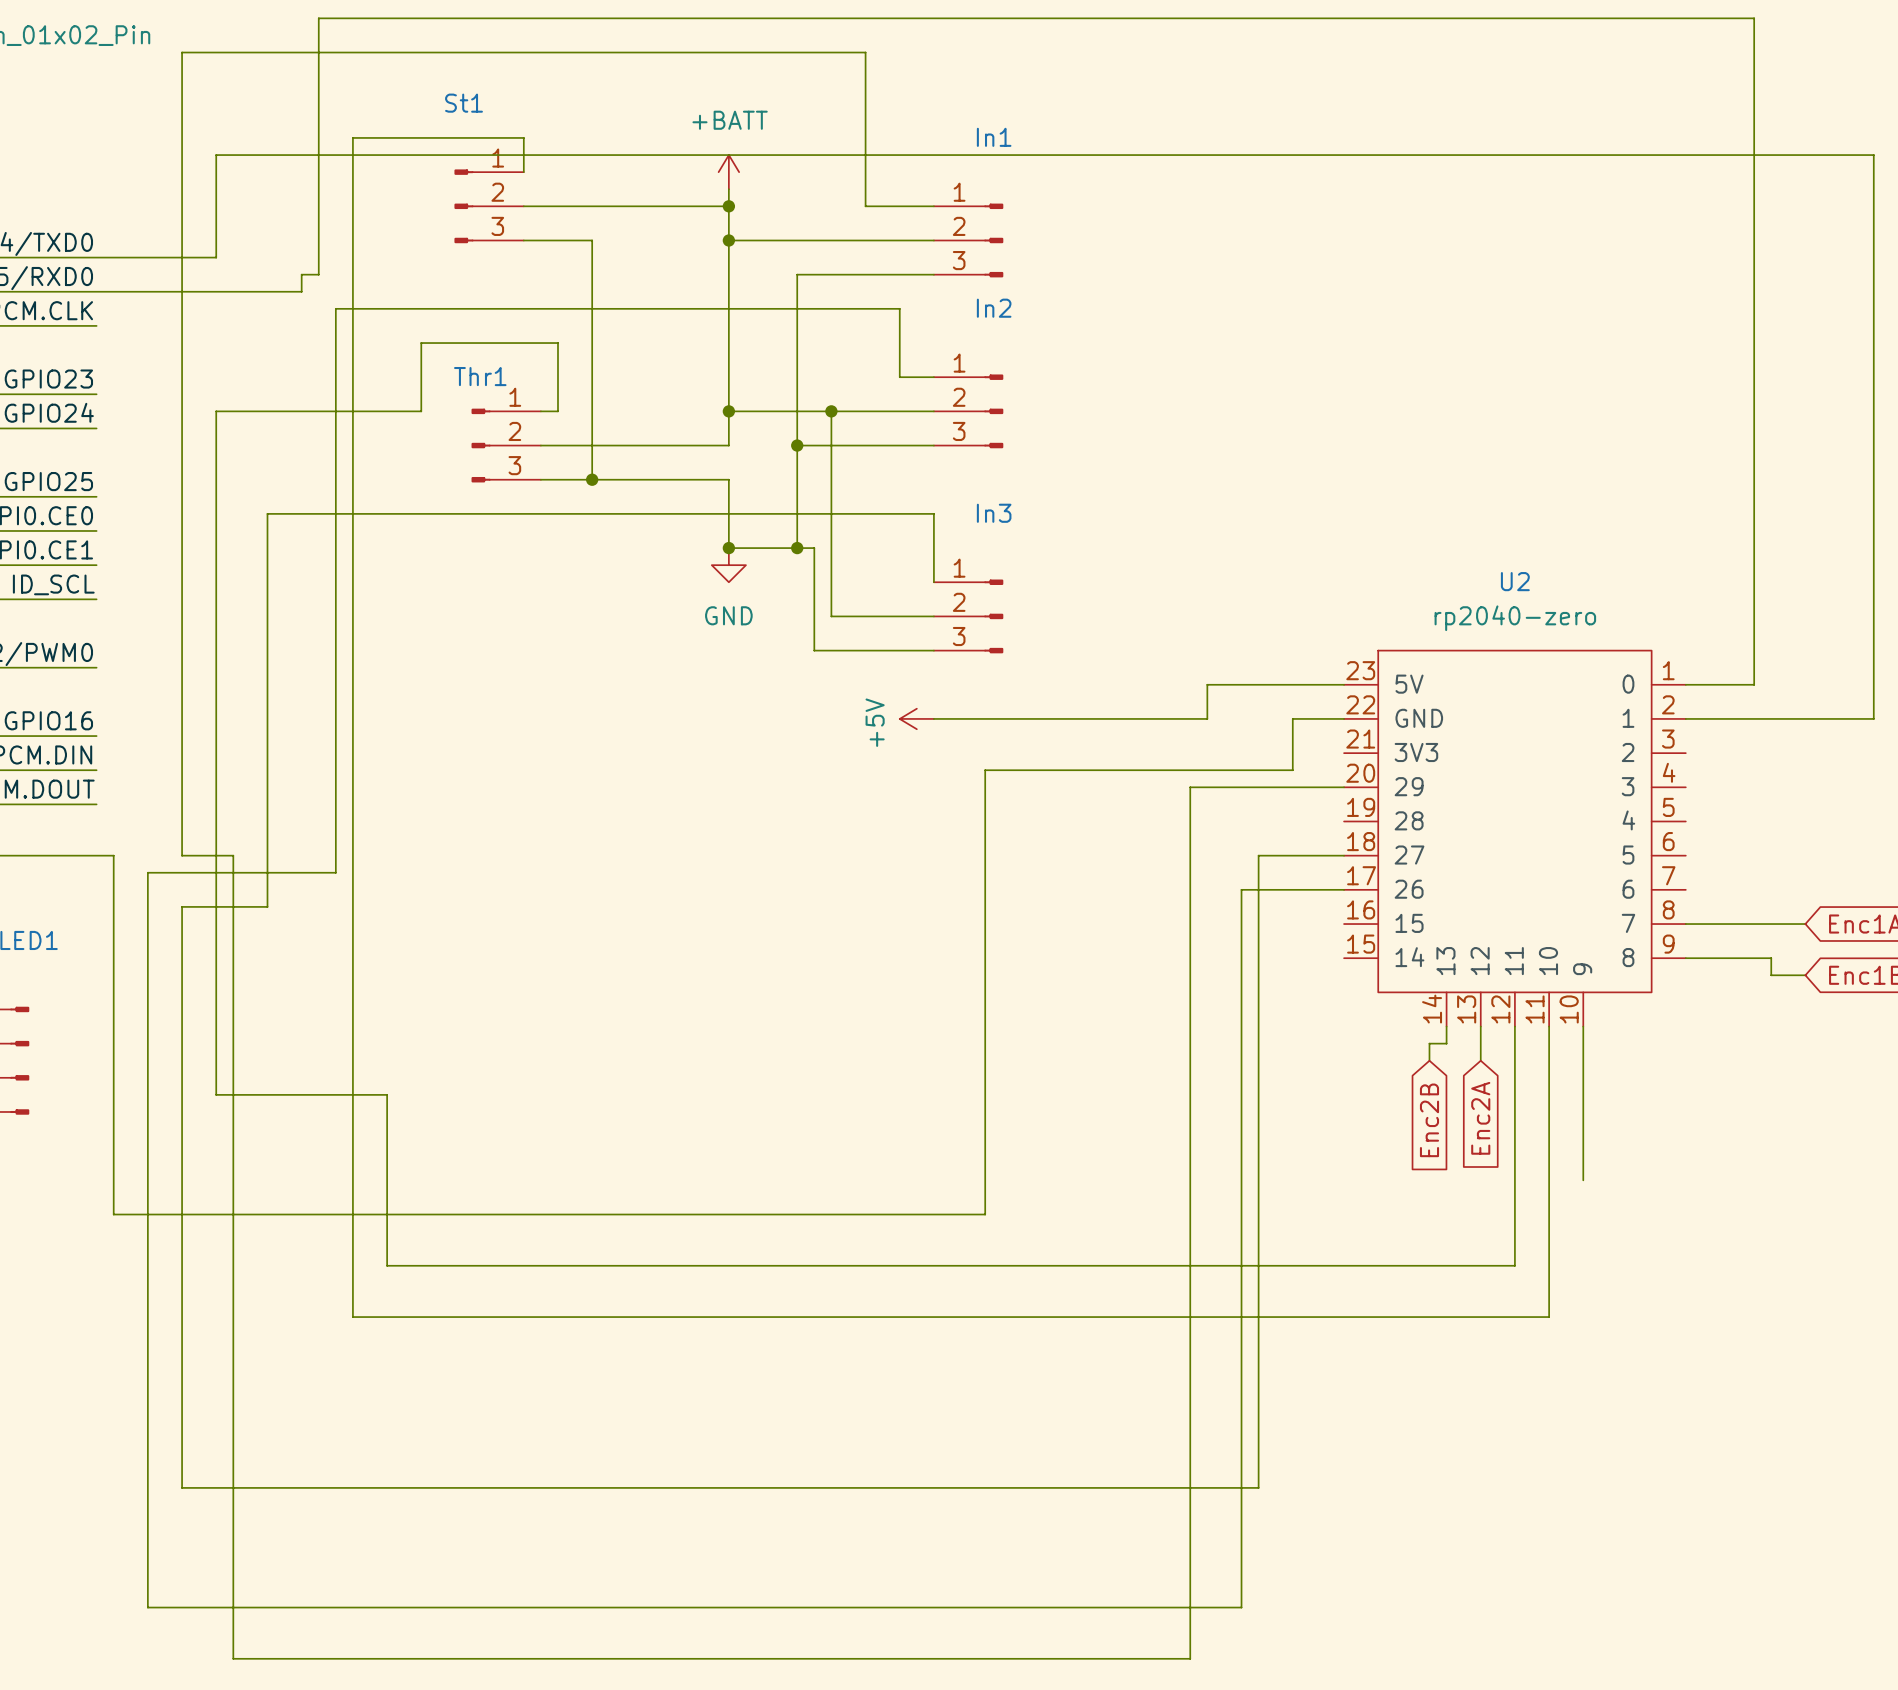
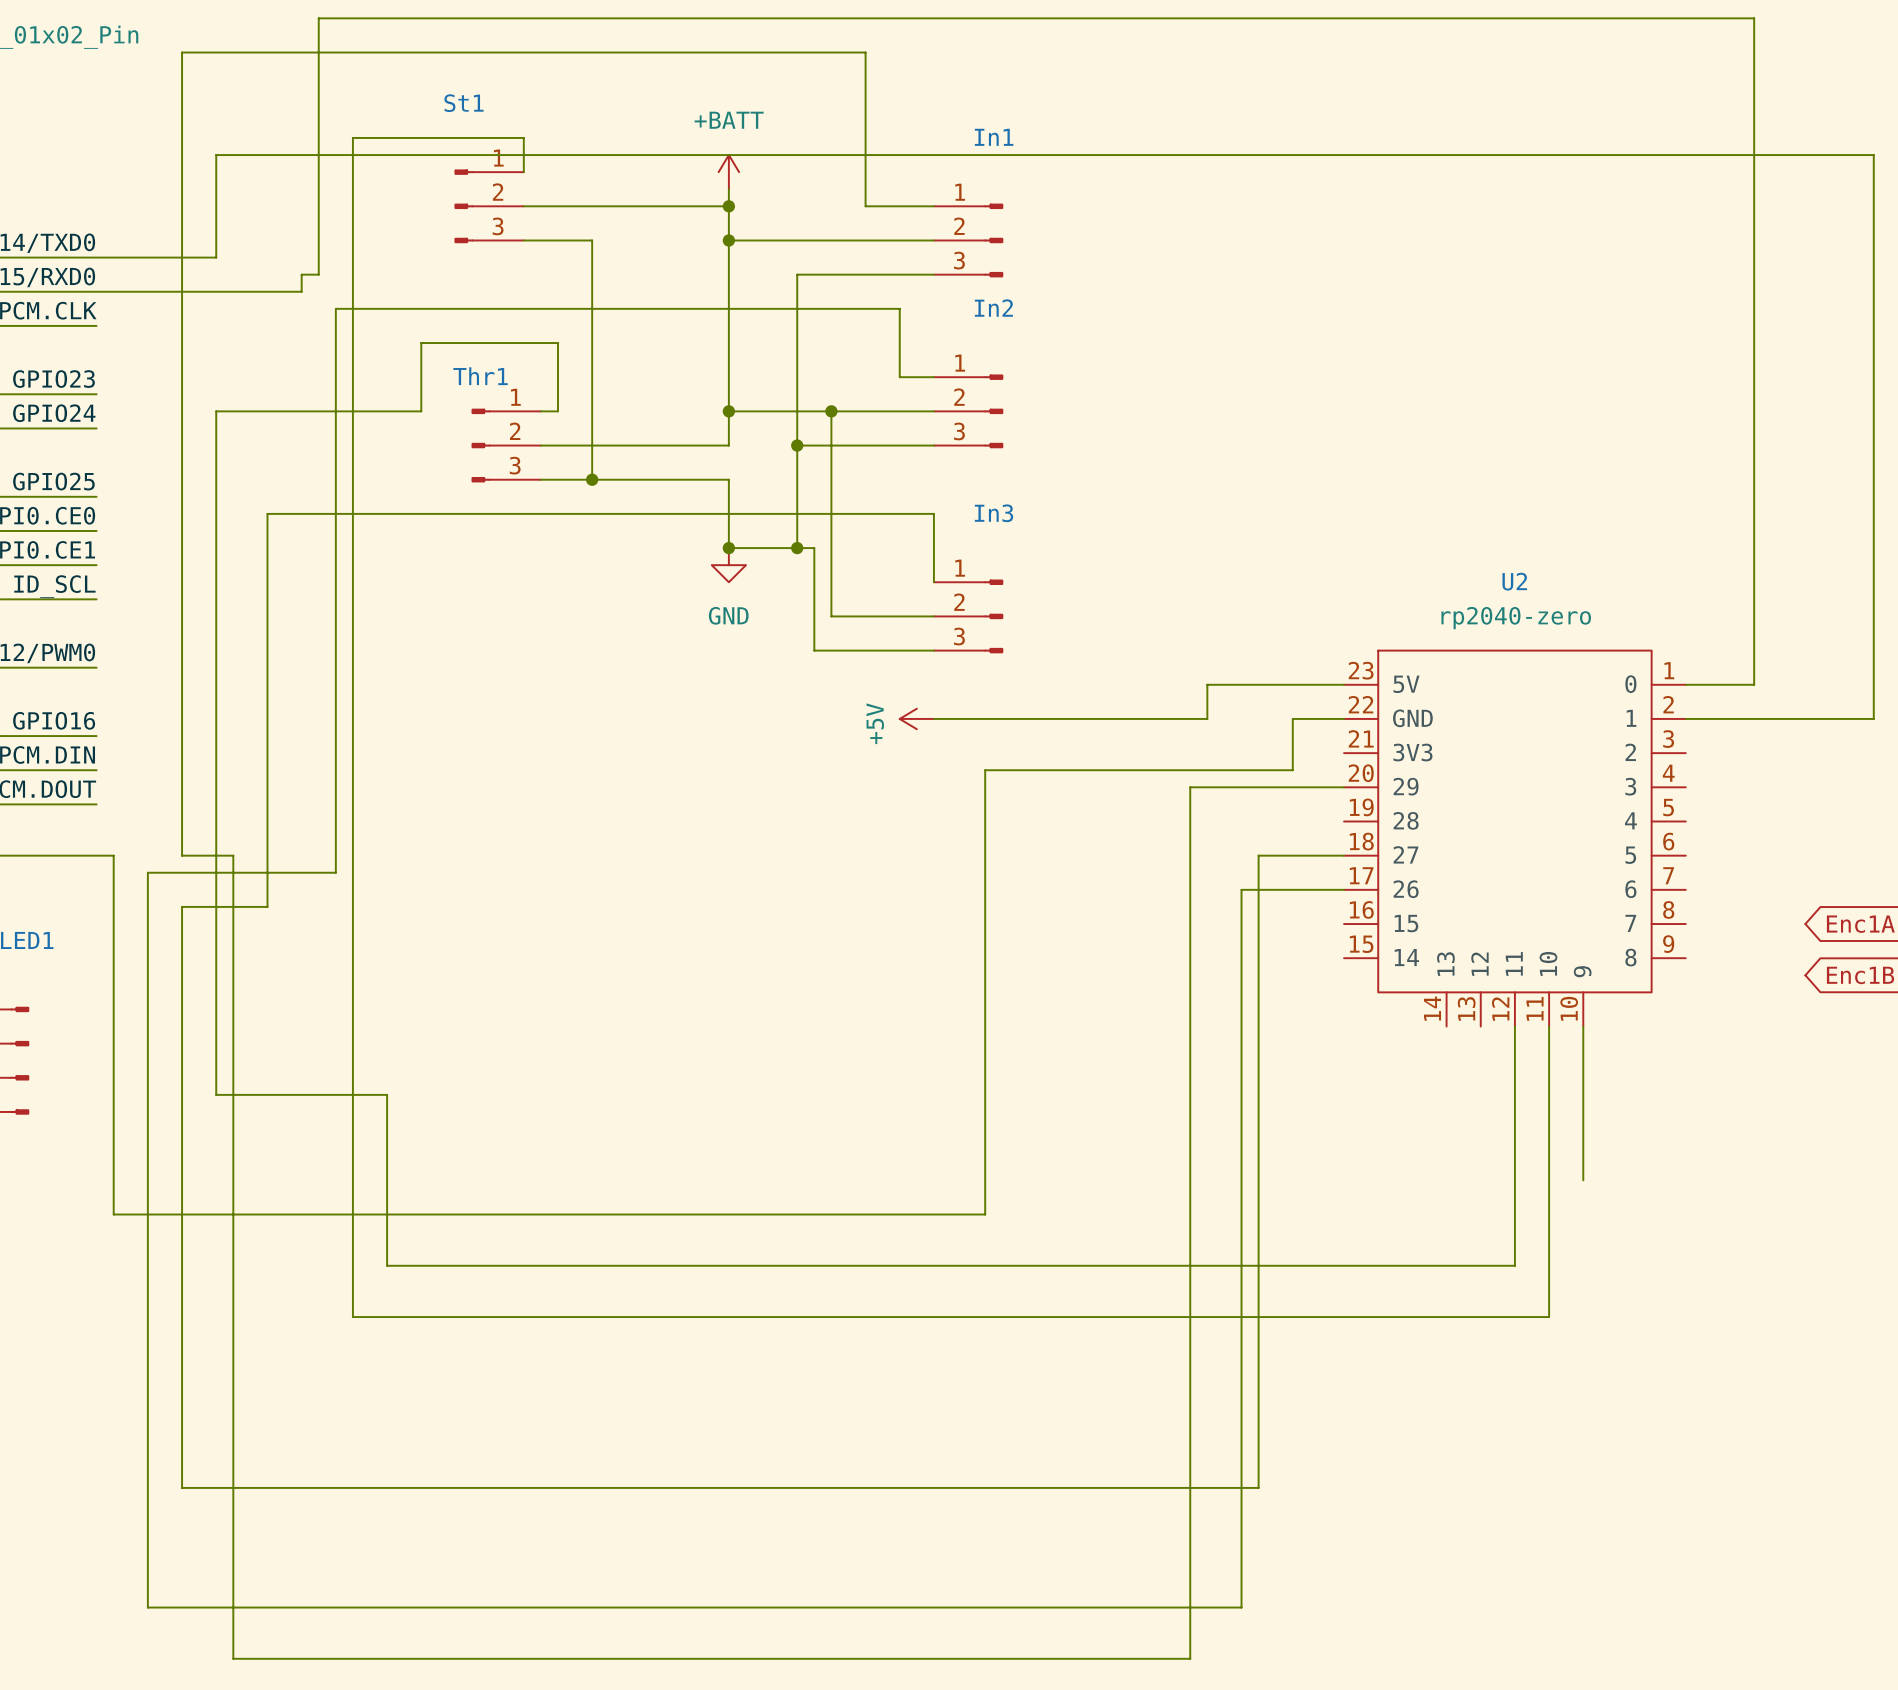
wire: (1685, 924) (1805, 924) -> none
wire: (1685, 958) (1771, 958) (1771, 975) (1805, 975) -> none
wire: (1446, 1026) (1446, 1043) (1429, 1043) (1429, 1060) -> none
wire: (1480, 1026) (1480, 1060) -> none
global label: Enc2A (1480, 1118) -> none
global label: Enc2B (1429, 1120) -> none

